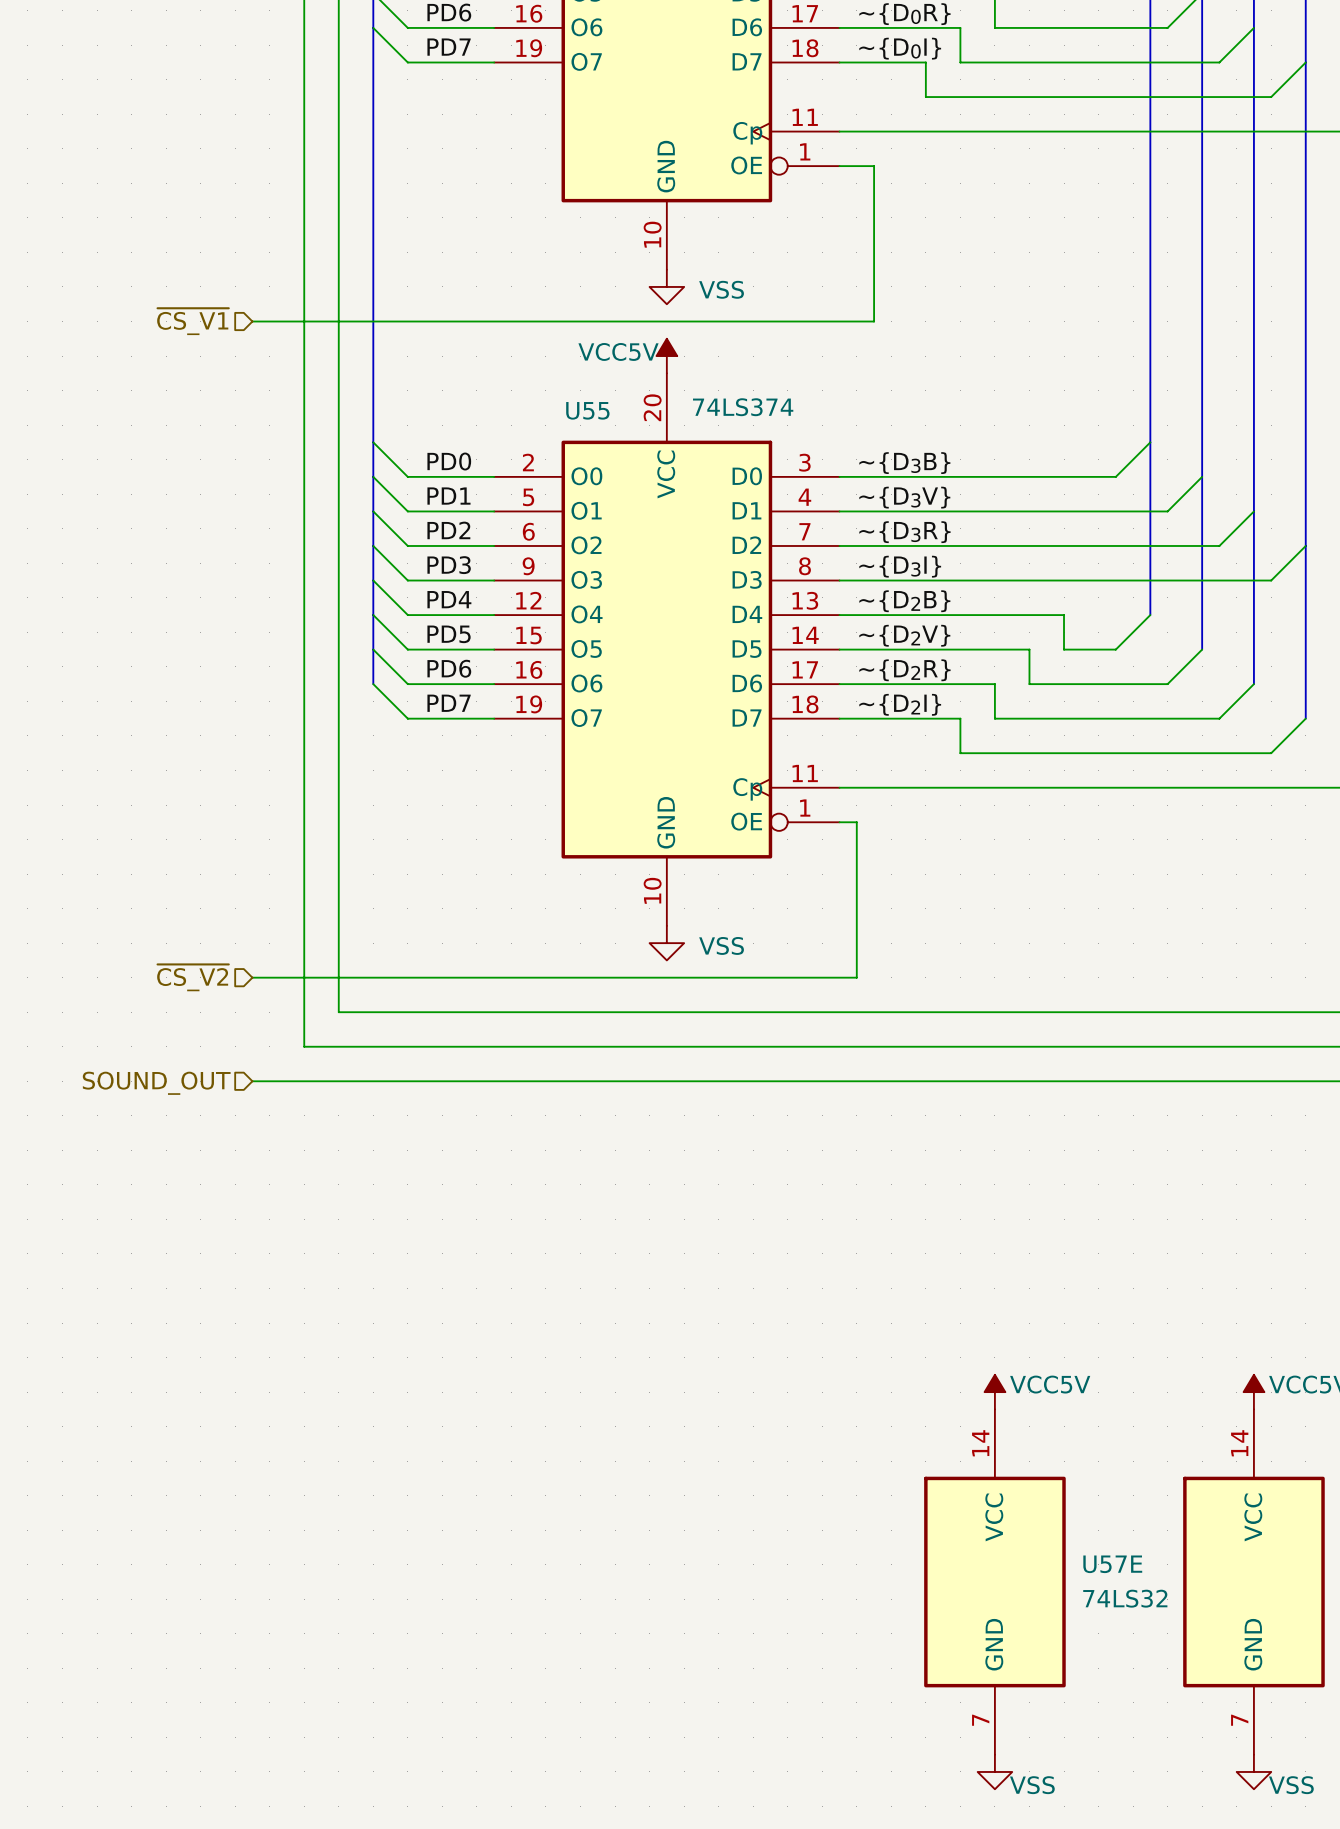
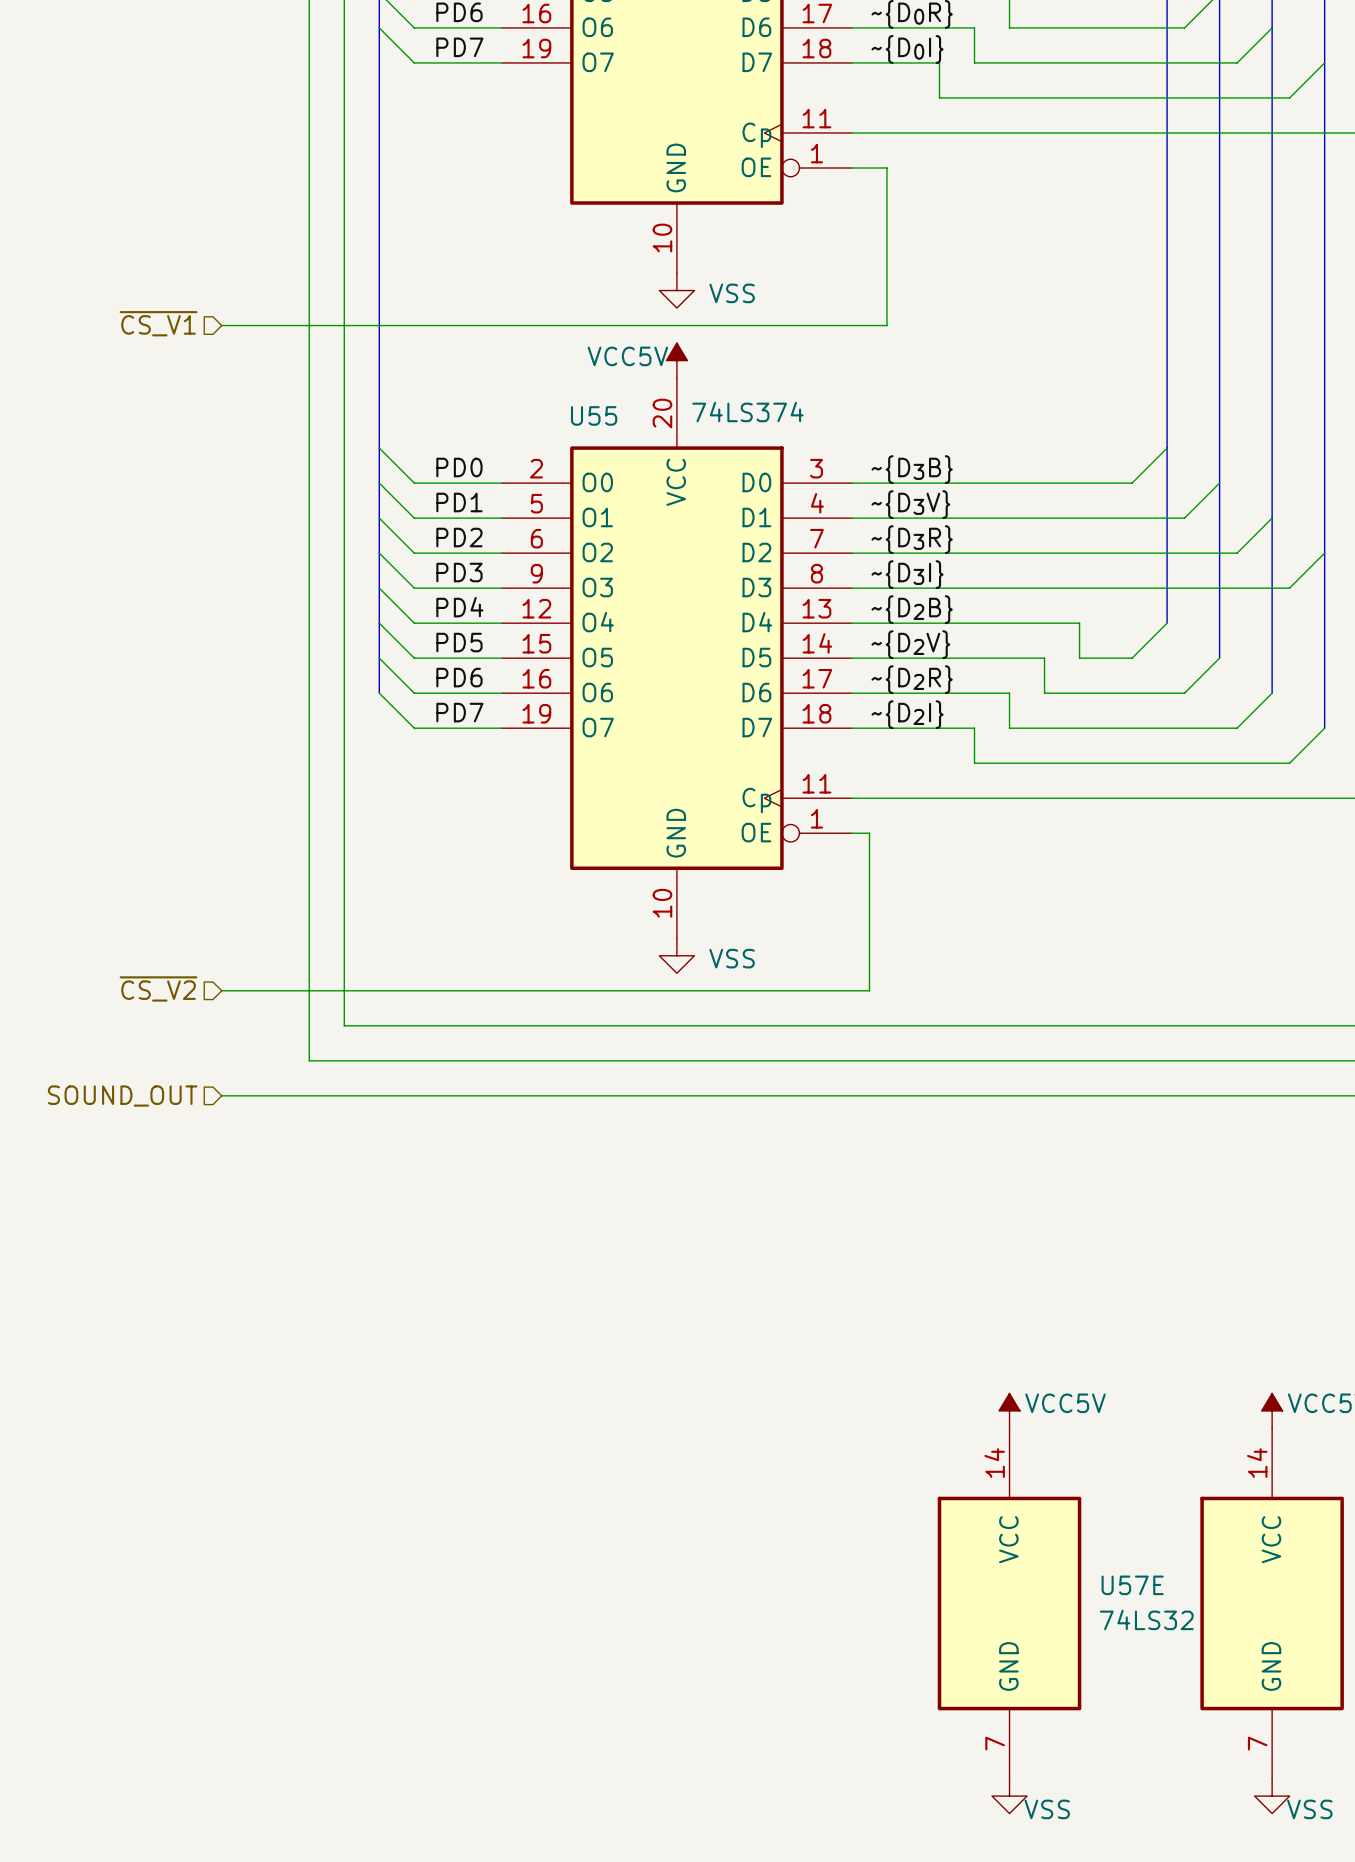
hierarchical label position: ~{CS_V1} (192, 321) -> ~{CS_V1} (158, 323)
wire: none -> (221, 325) (256, 325)
hierarchical label position: ~{CS_V2} (192, 977) -> ~{CS_V2} (158, 988)
wire: none -> (221, 990) (256, 990)
wire: none -> (221, 1095) (256, 1095)
hierarchical label position: SOUND_OUT (156, 1083) -> SOUND_OUT (122, 1096)

